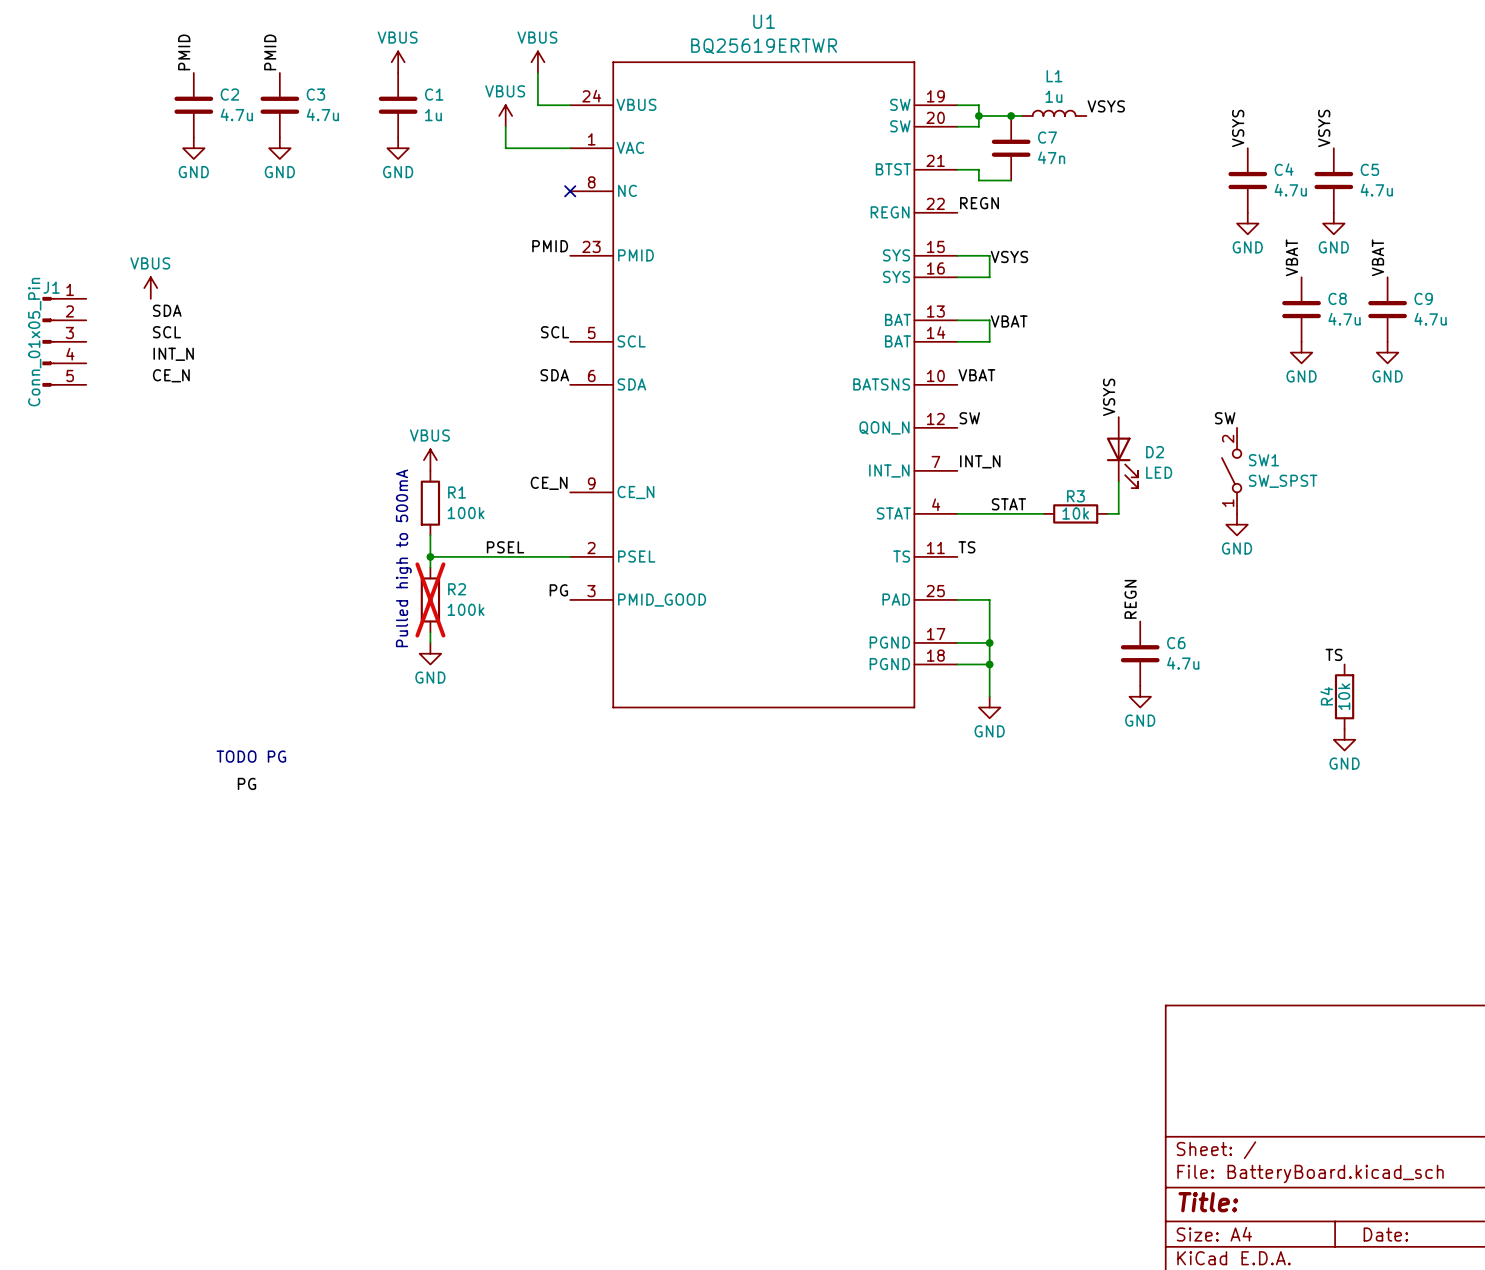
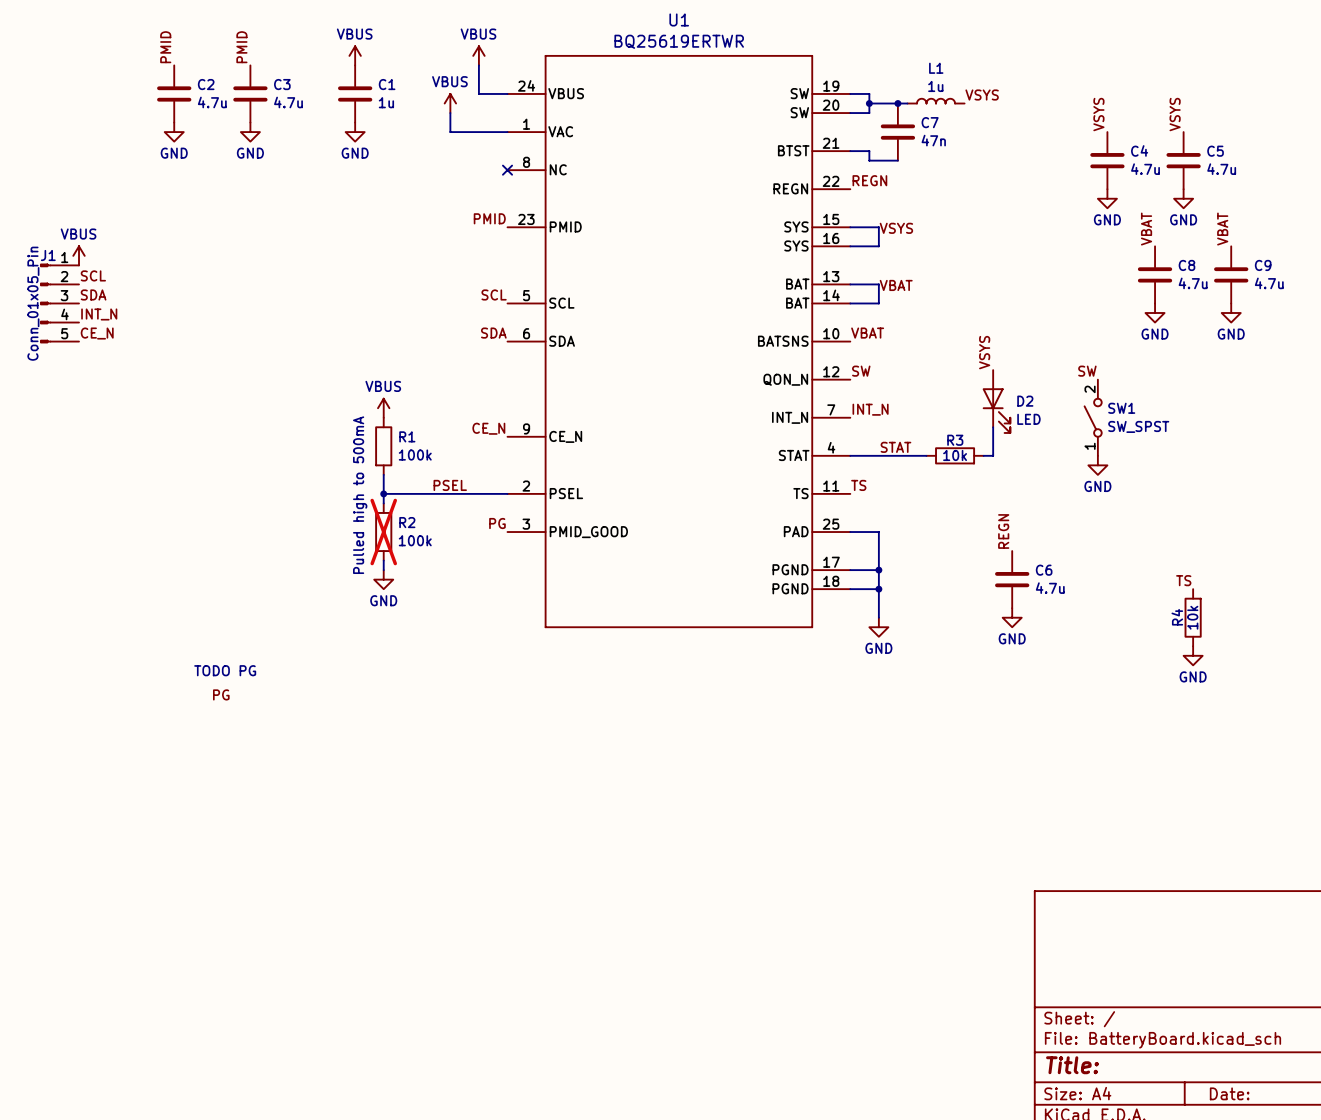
power symbol position: VBUS (150, 288) -> VBUS (79, 255)
label position: SDA (167, 310) -> SDA (93, 294)
label position: SCL (166, 332) -> SCL (93, 275)
label position: INT_N (173, 354) -> INT_N (99, 314)
label position: CE_N (171, 375) -> CE_N (97, 333)

